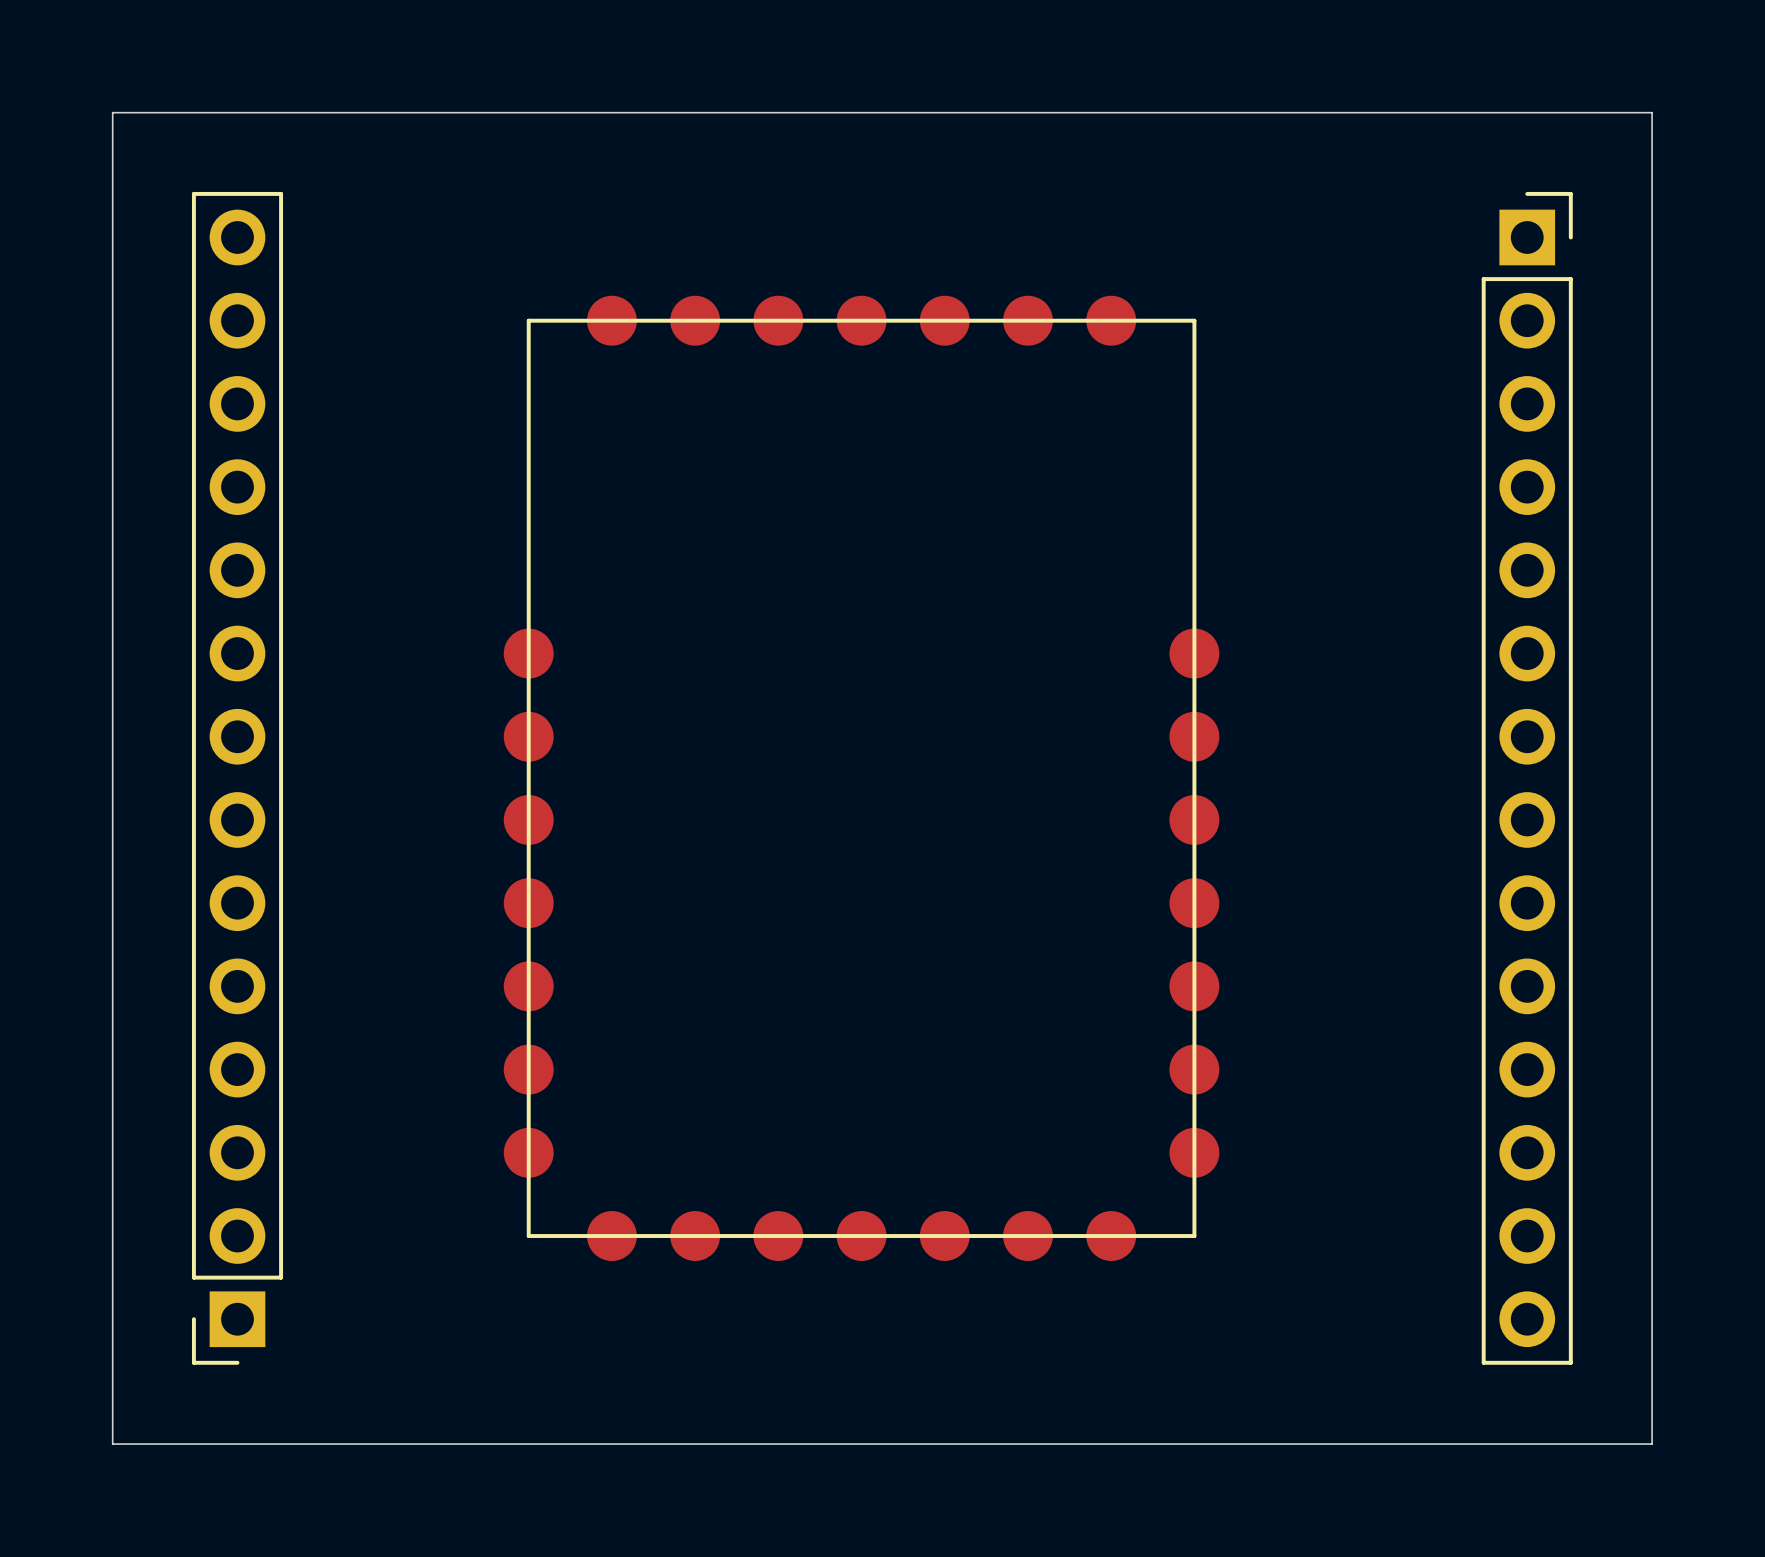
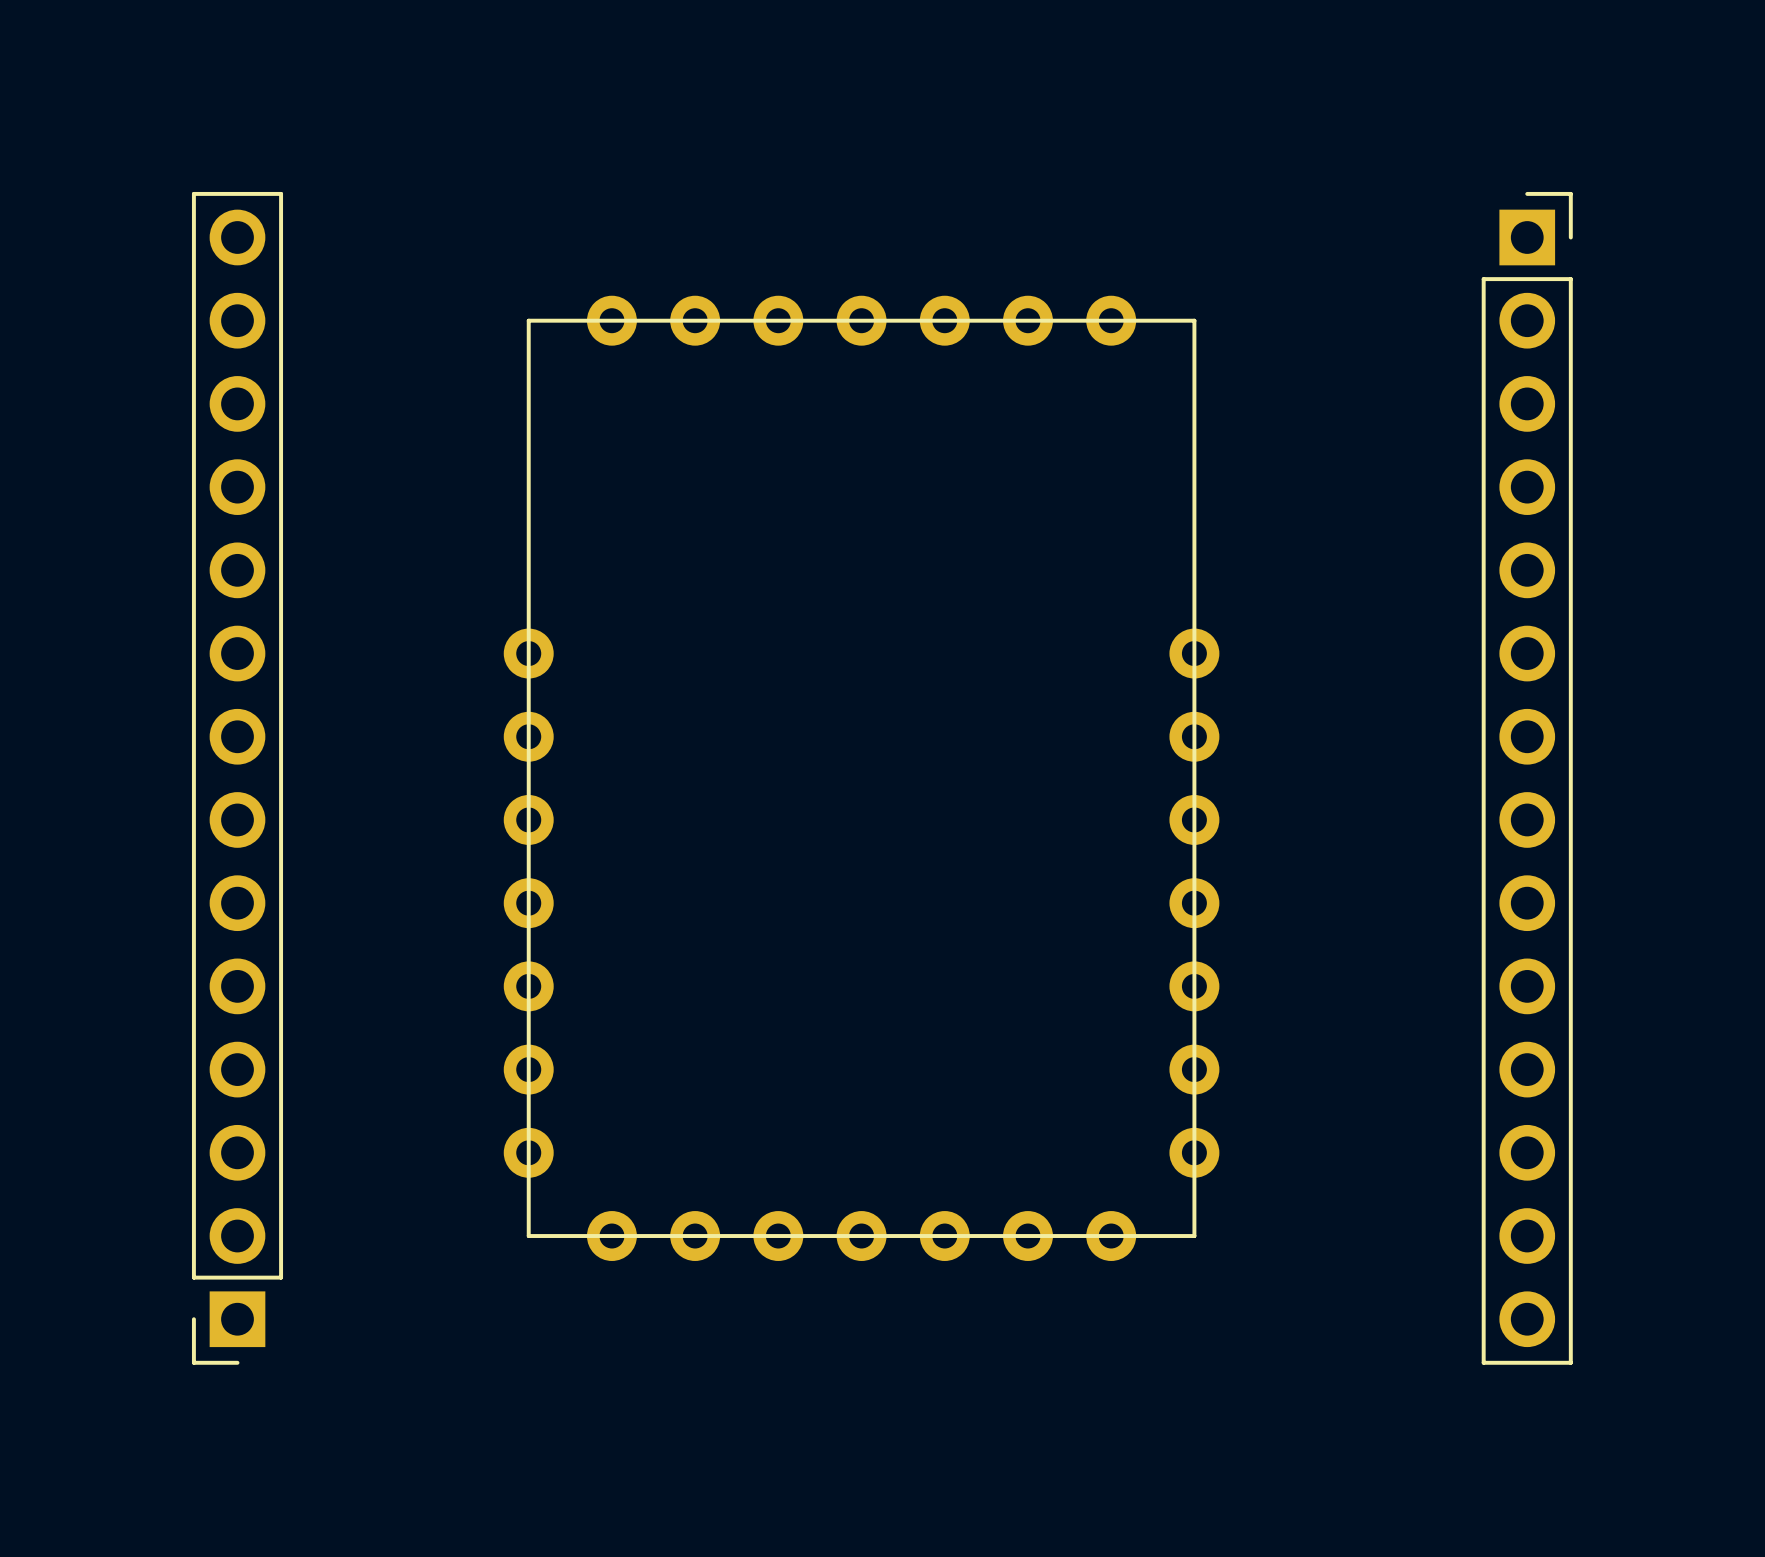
board edge: (112, 112) (112, 1444) (1652, 1444) (1652, 112) (112, 112) -> none
part footprint: [503, 295, 1220, 1261] -> [503, 295, 1220, 1261]

